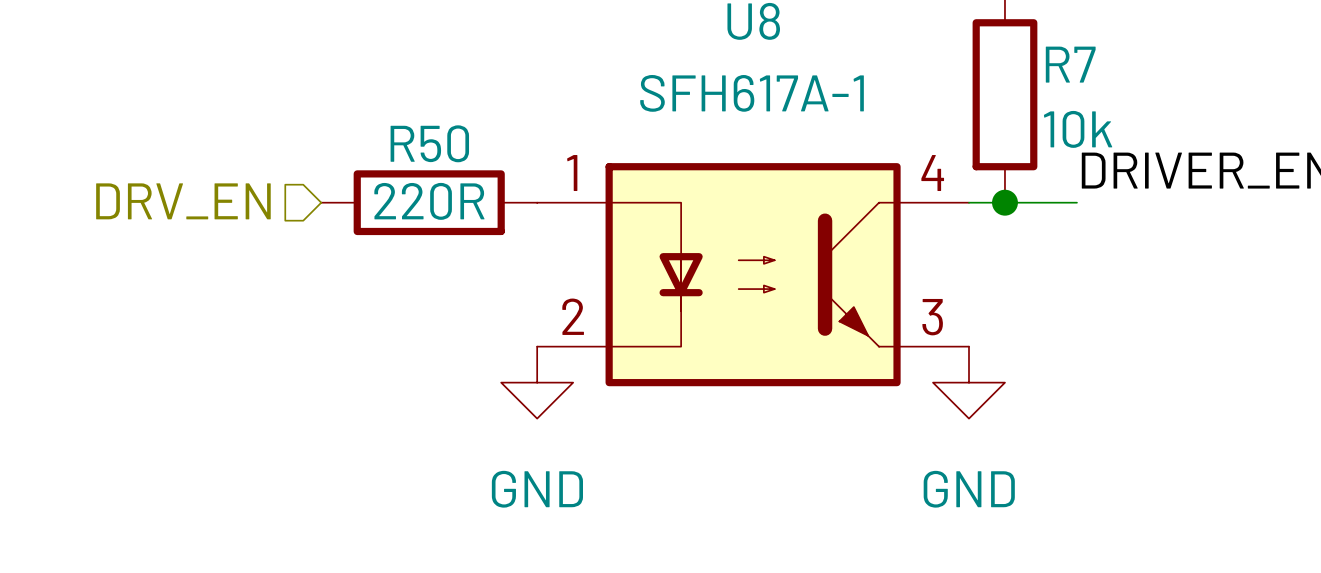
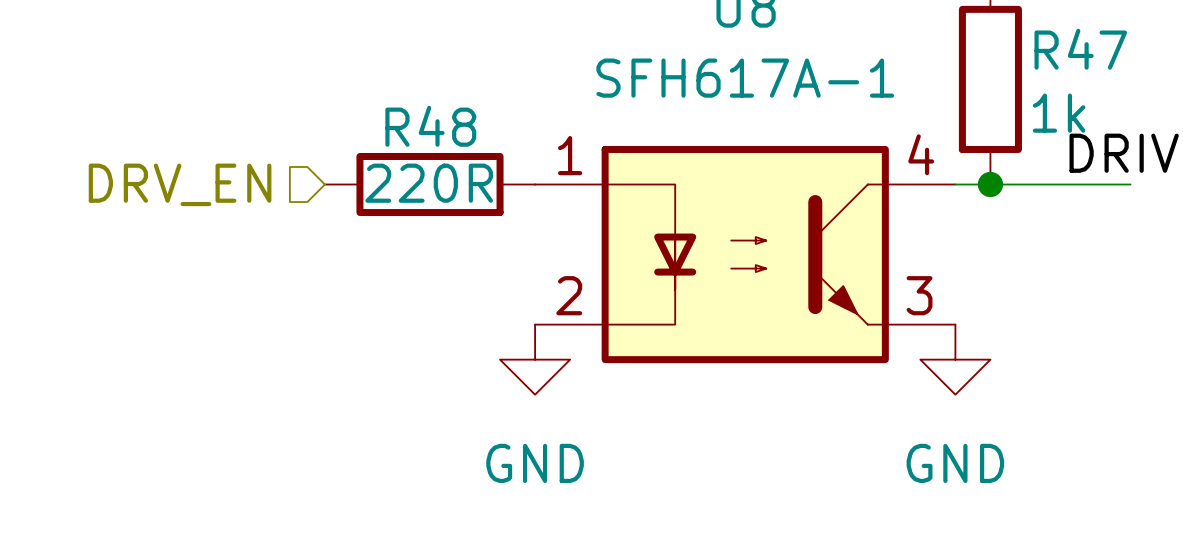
R7 name: R7 (1070, 64) -> R47 (1080, 49)
R7 value: 10k (1078, 129) -> 1k (1059, 113)
R50 name: R50 (429, 143) -> R48 (430, 126)
wire: none -> (1060, 184) (1130, 184)

